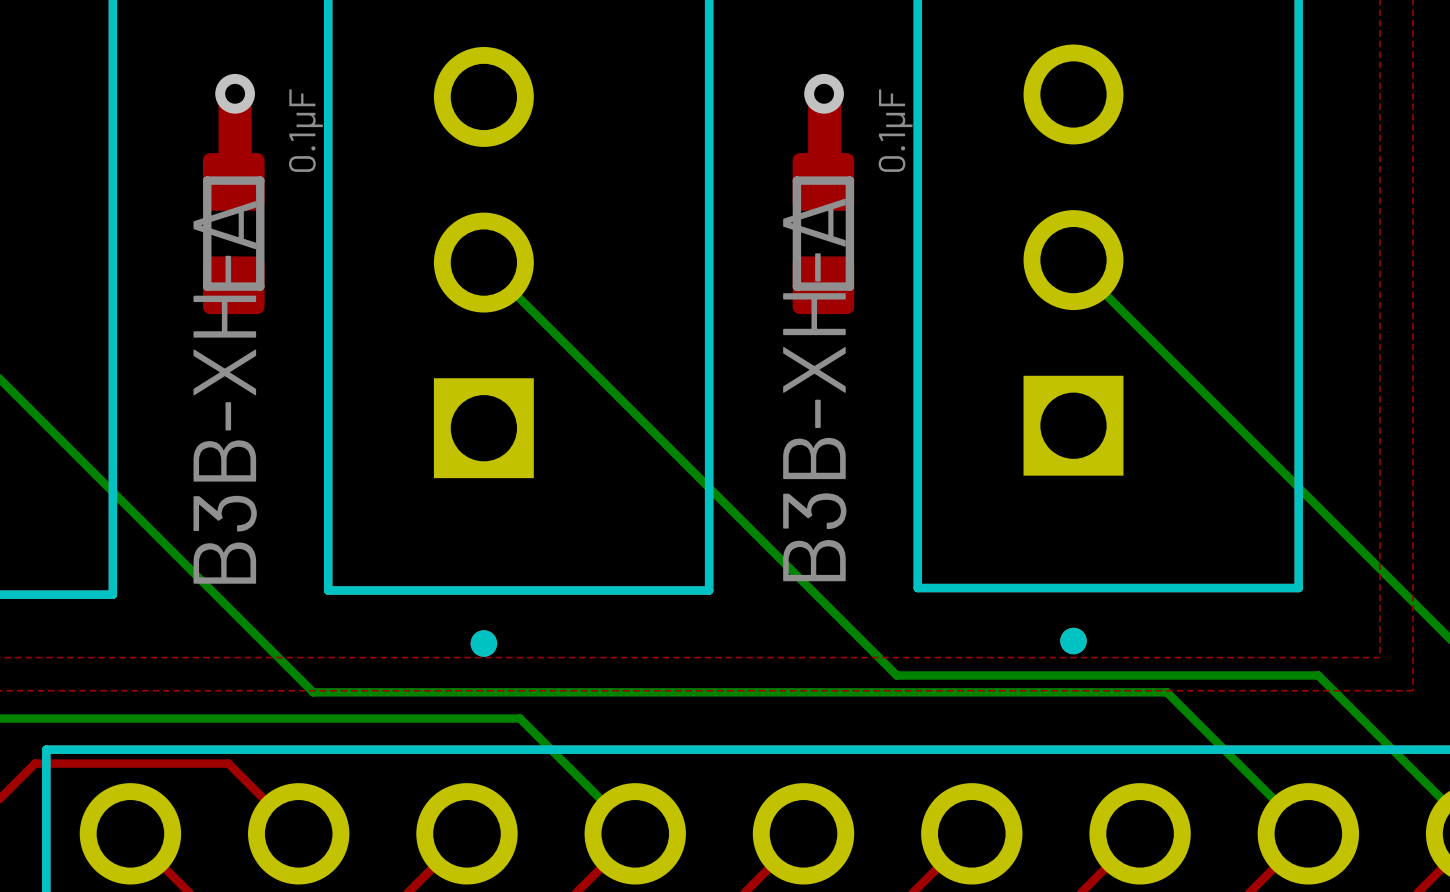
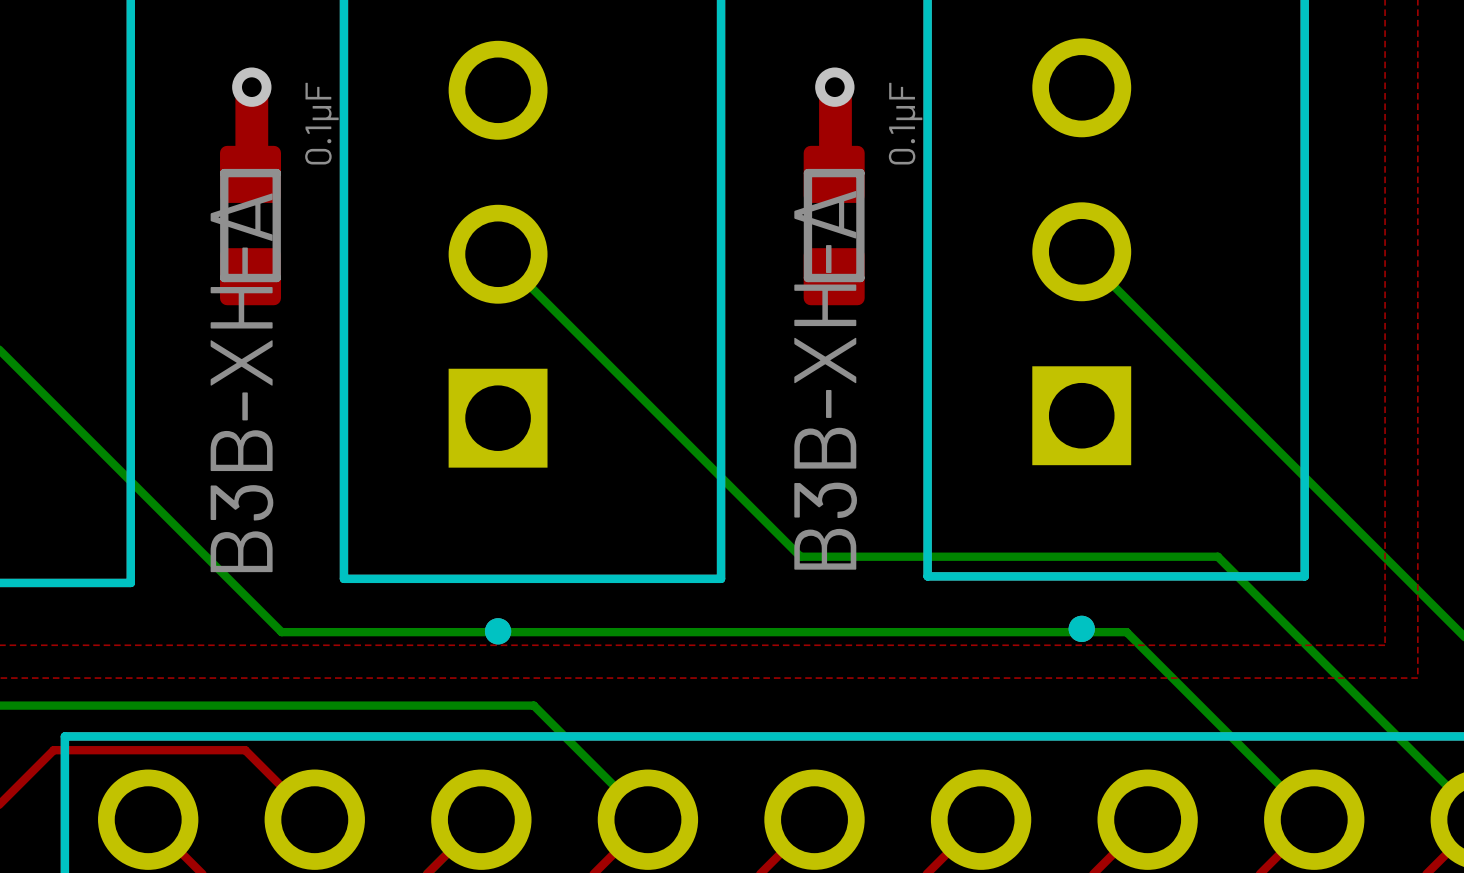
bottom track: (789, 568) (896, 675) (1318, 675) -> (800, 556) (1217, 556) (1324, 662)
bottom track: (265, 644) (313, 692) (1166, 692) -> (281, 632) (1126, 632) (1174, 679)

